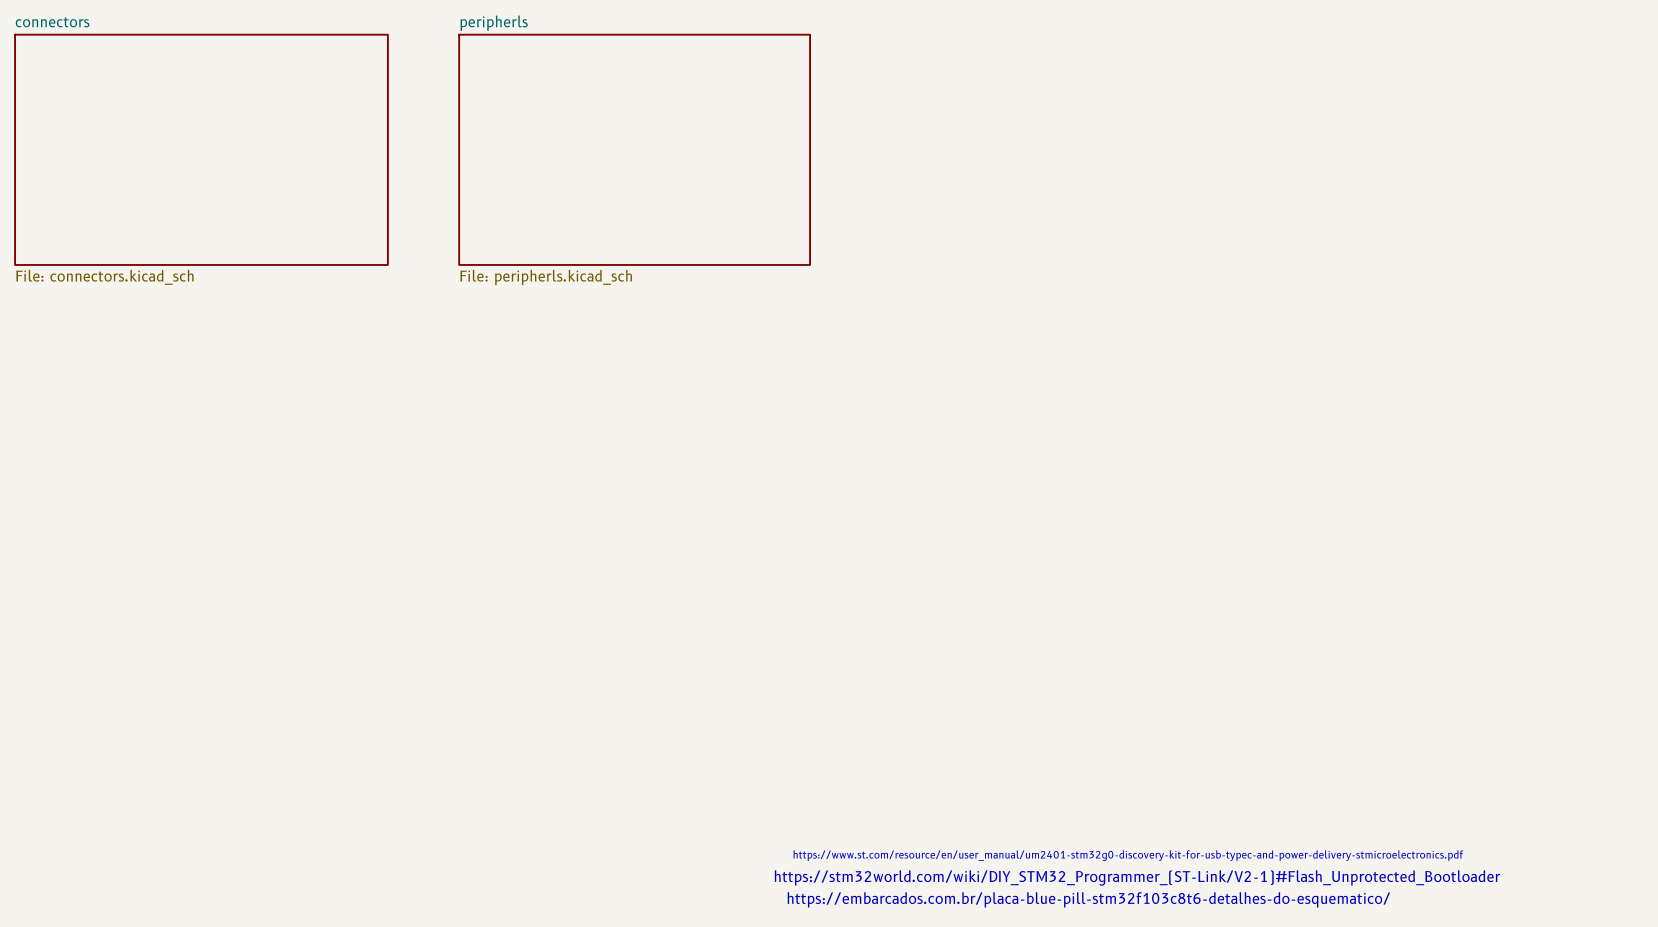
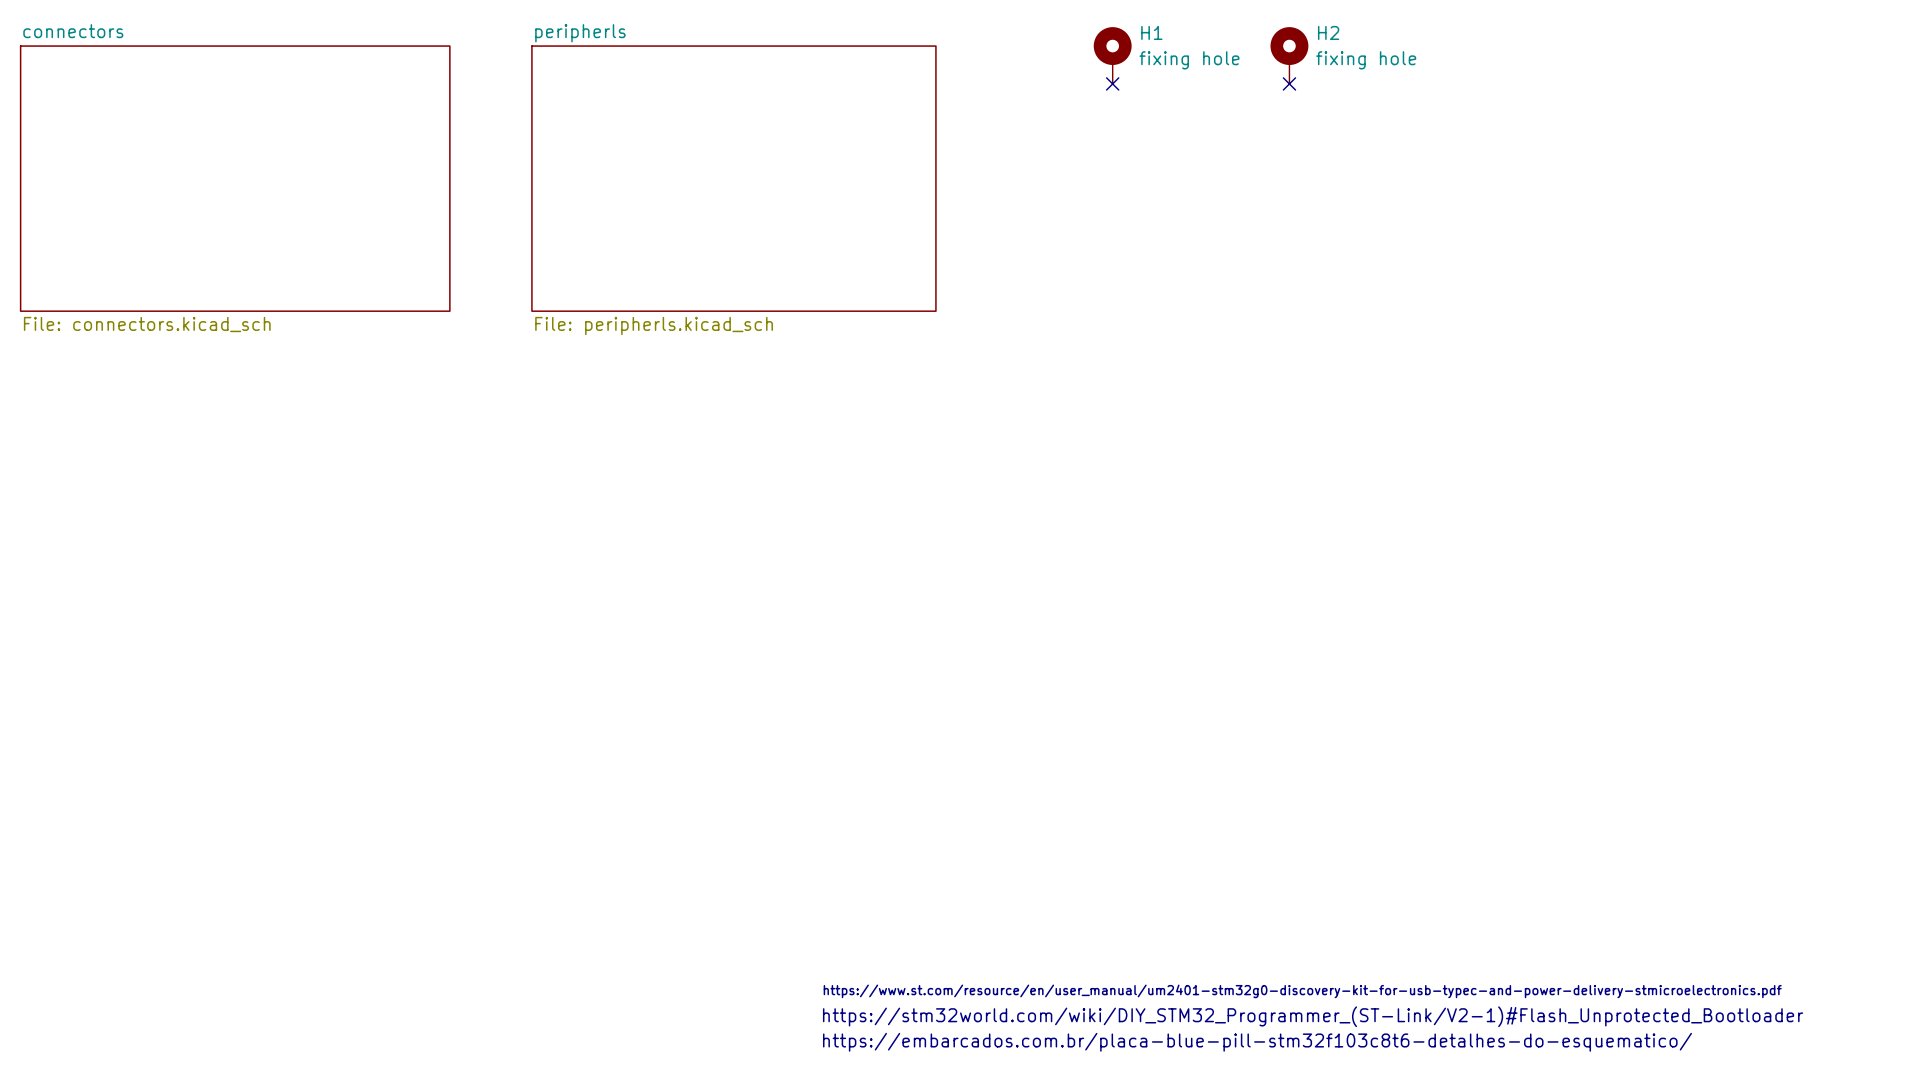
H1: none -> fixing hole (1112, 55)
H2: none -> fixing hole (1289, 55)
no-connect mark: none -> (1112, 83)
no-connect mark: none -> (1289, 83)

